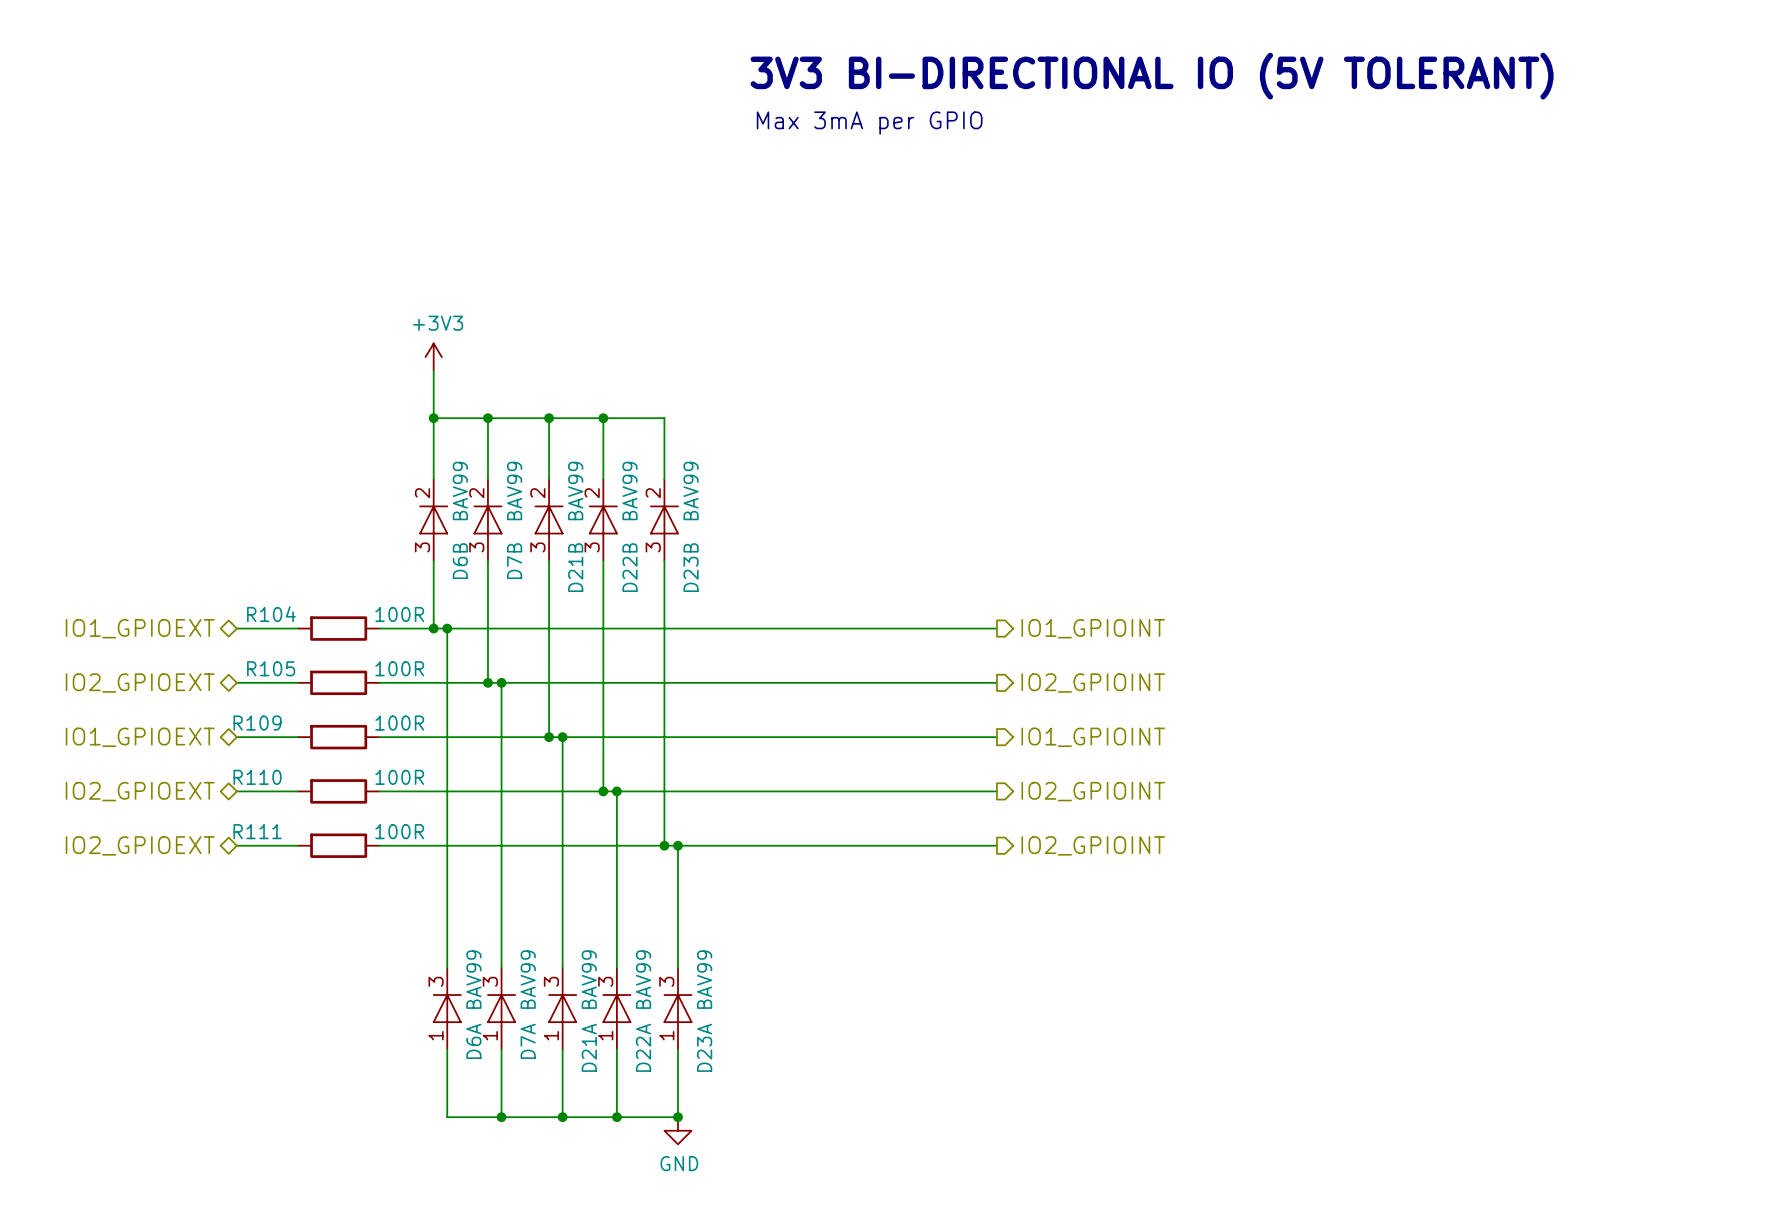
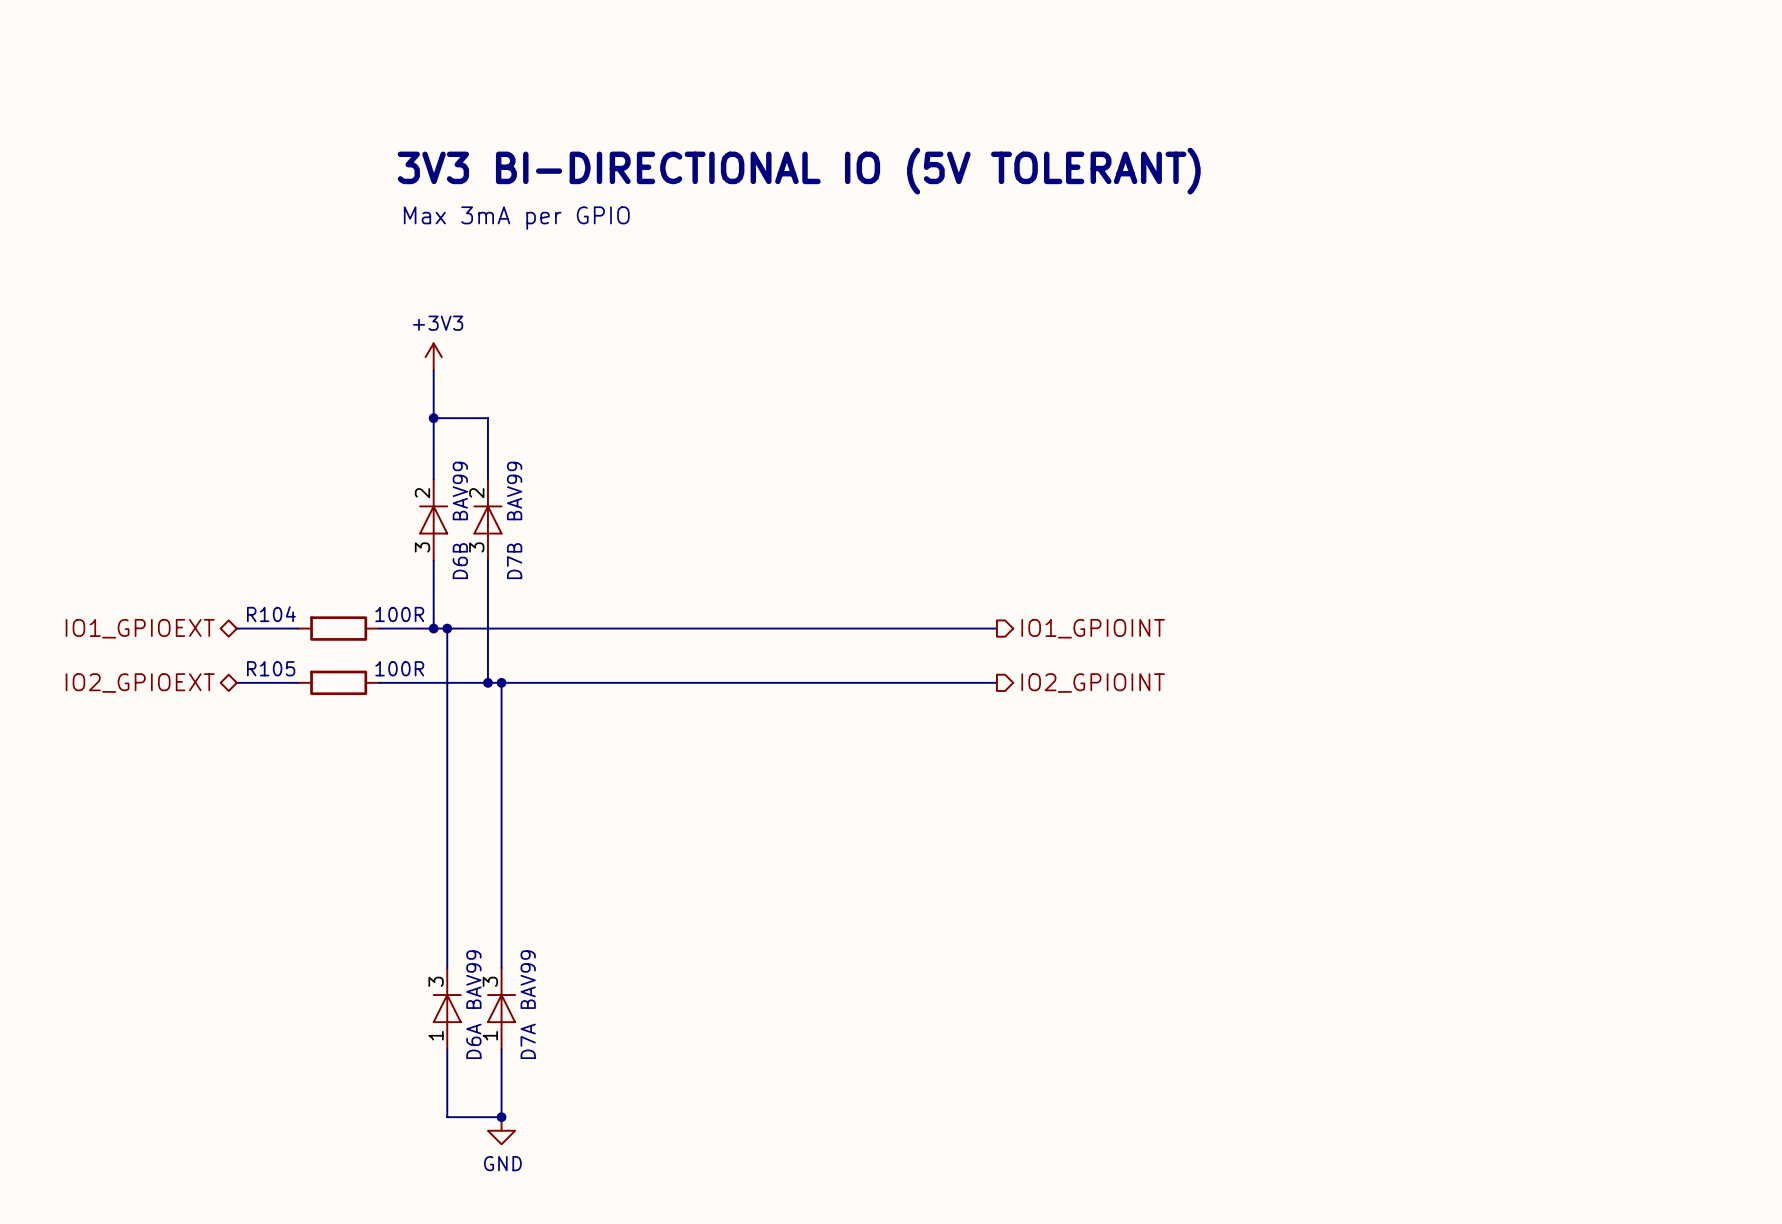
text: 3V3 BI-DIRECTIONAL IO (5V TOLERANT) (1152, 76) -> none
text: Max 3mA per GPIO (869, 123) -> none
text: none -> 3V3 BI-DIRECTIONAL IO (5V TOLERANT) (799, 171)
text: none -> Max 3mA per GPIO (516, 218)
wire: (487, 418) (664, 418) (664, 479) -> none
junction: (487, 418) -> none
wire: (549, 418) (549, 479) -> none
junction: (549, 418) -> none
wire: (603, 418) (603, 479) -> none
junction: (603, 418) -> none
D21B: BAV99 (549, 519) -> none
D22B: BAV99 (603, 519) -> none
D23B: BAV99 (664, 519) -> none
wire: (549, 560) (549, 737) -> none
wire: (603, 560) (603, 791) -> none
wire: (664, 560) (664, 845) -> none
hierarchical label: IO1_GPIOEXT (140, 737) -> none
wire: (236, 737) (297, 737) -> none
R109: 100R (338, 737) -> none
wire: (379, 737) (996, 737) -> none
junction: (549, 737) -> none
wire: (562, 737) (562, 967) -> none
junction: (562, 737) -> none
hierarchical label: IO1_GPIOINT (1093, 737) -> none
hierarchical label: IO2_GPIOEXT (140, 791) -> none
wire: (236, 791) (297, 791) -> none
R110: 100R (338, 791) -> none
wire: (379, 791) (996, 791) -> none
junction: (603, 791) -> none
wire: (616, 791) (616, 967) -> none
junction: (616, 791) -> none
hierarchical label: IO2_GPIOINT (1093, 791) -> none
hierarchical label: IO2_GPIOEXT (140, 845) -> none
wire: (236, 845) (297, 845) -> none
R111: 100R (338, 845) -> none
wire: (379, 845) (996, 845) -> none
junction: (664, 845) -> none
wire: (677, 845) (677, 967) -> none
junction: (677, 845) -> none
hierarchical label: IO2_GPIOINT (1093, 845) -> none
D21A: BAV99 (562, 1008) -> none
D22A: BAV99 (616, 1008) -> none
D23A: BAV99 (677, 1008) -> none
wire: (562, 1049) (562, 1117) -> none
wire: (616, 1049) (616, 1117) -> none
wire: (677, 1049) (677, 1117) (501, 1117) -> none
junction: (562, 1117) -> none
junction: (616, 1117) -> none
junction: (677, 1117) -> none
power symbol position: GND (677, 1130) -> GND (501, 1130)

